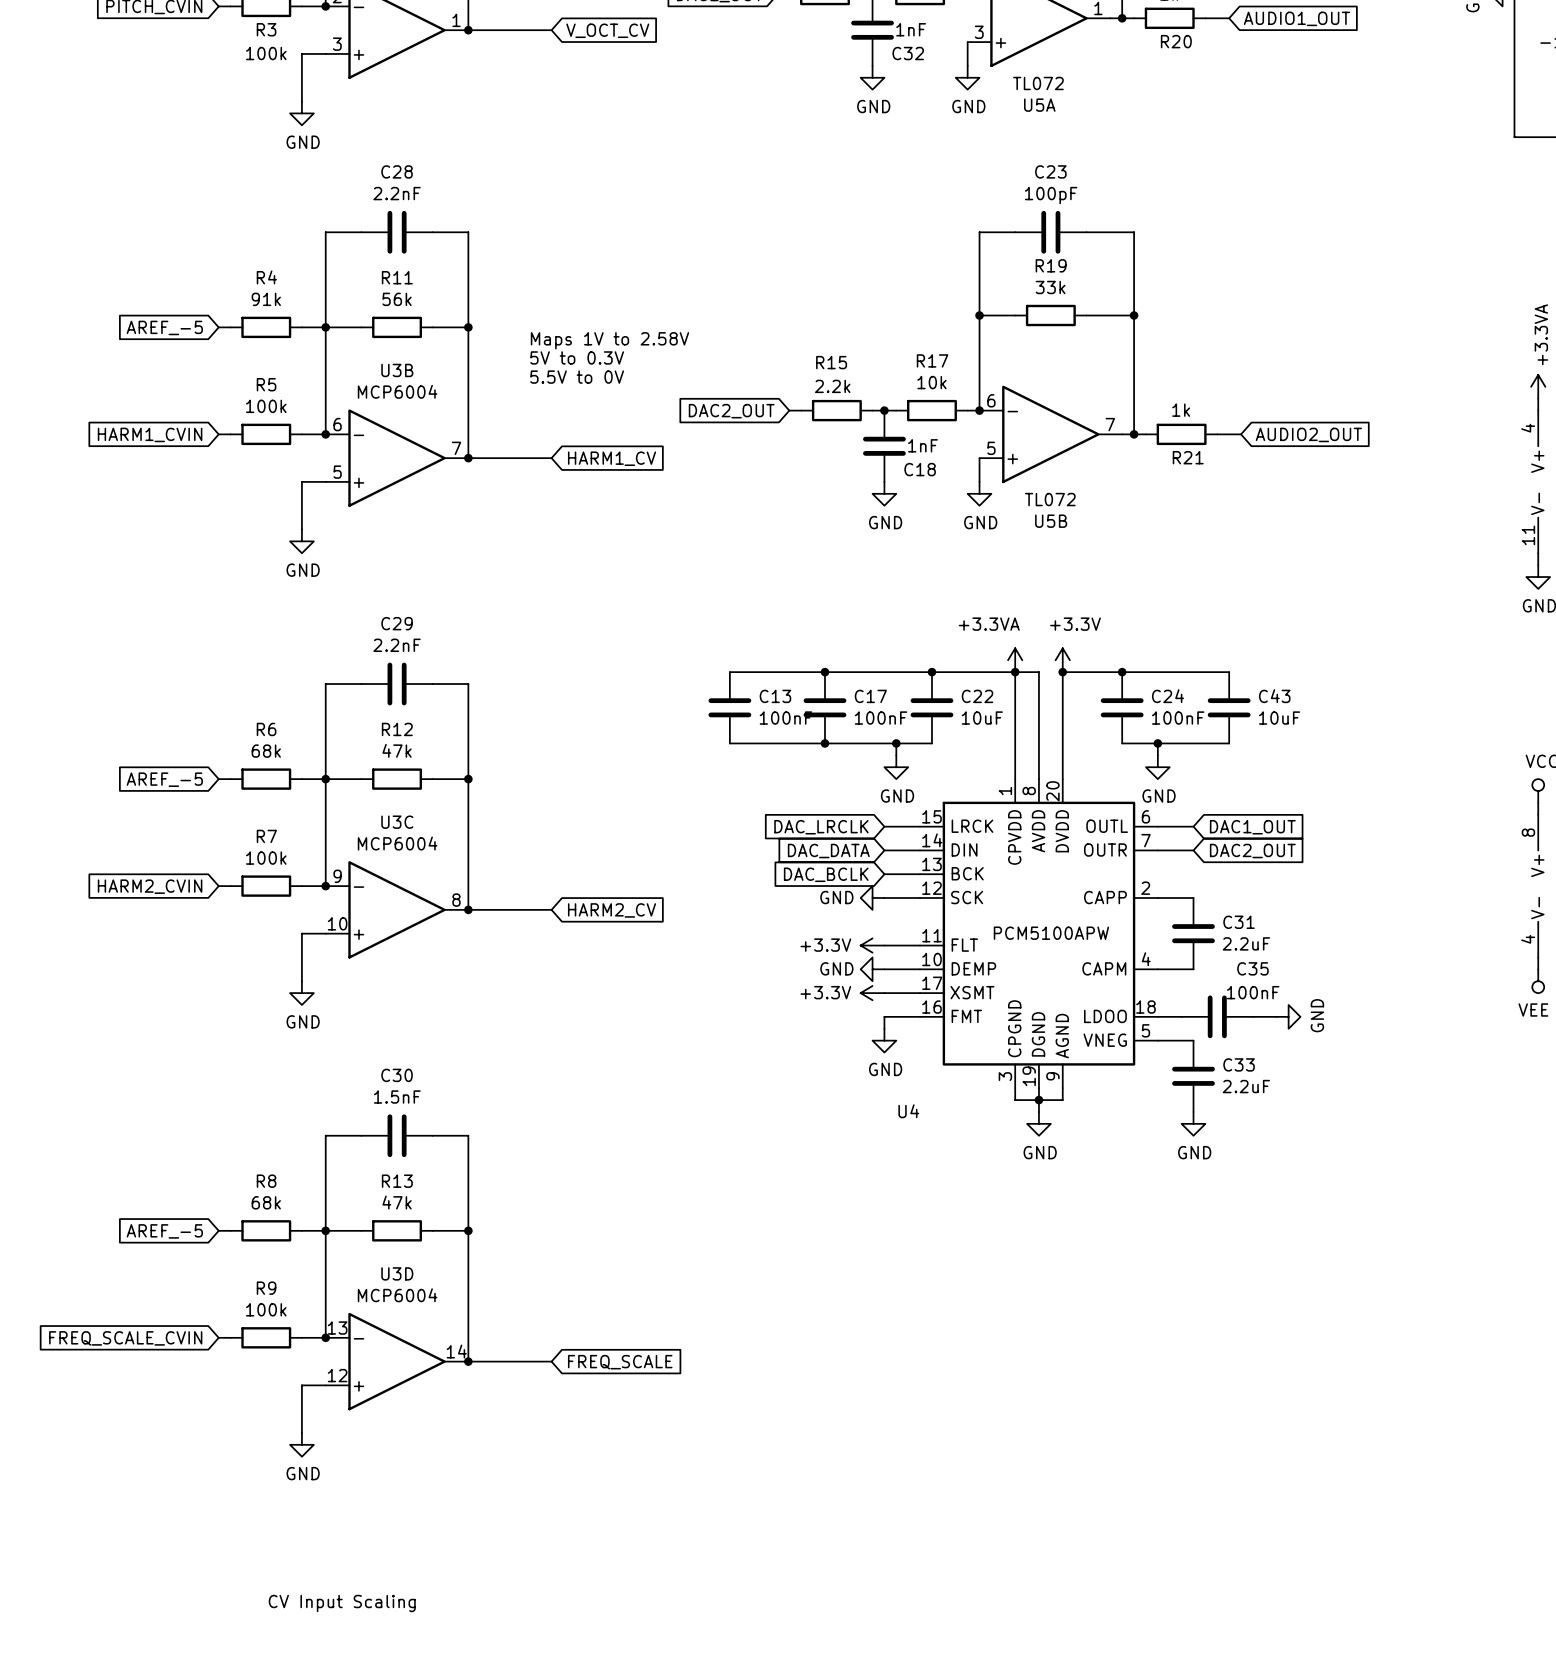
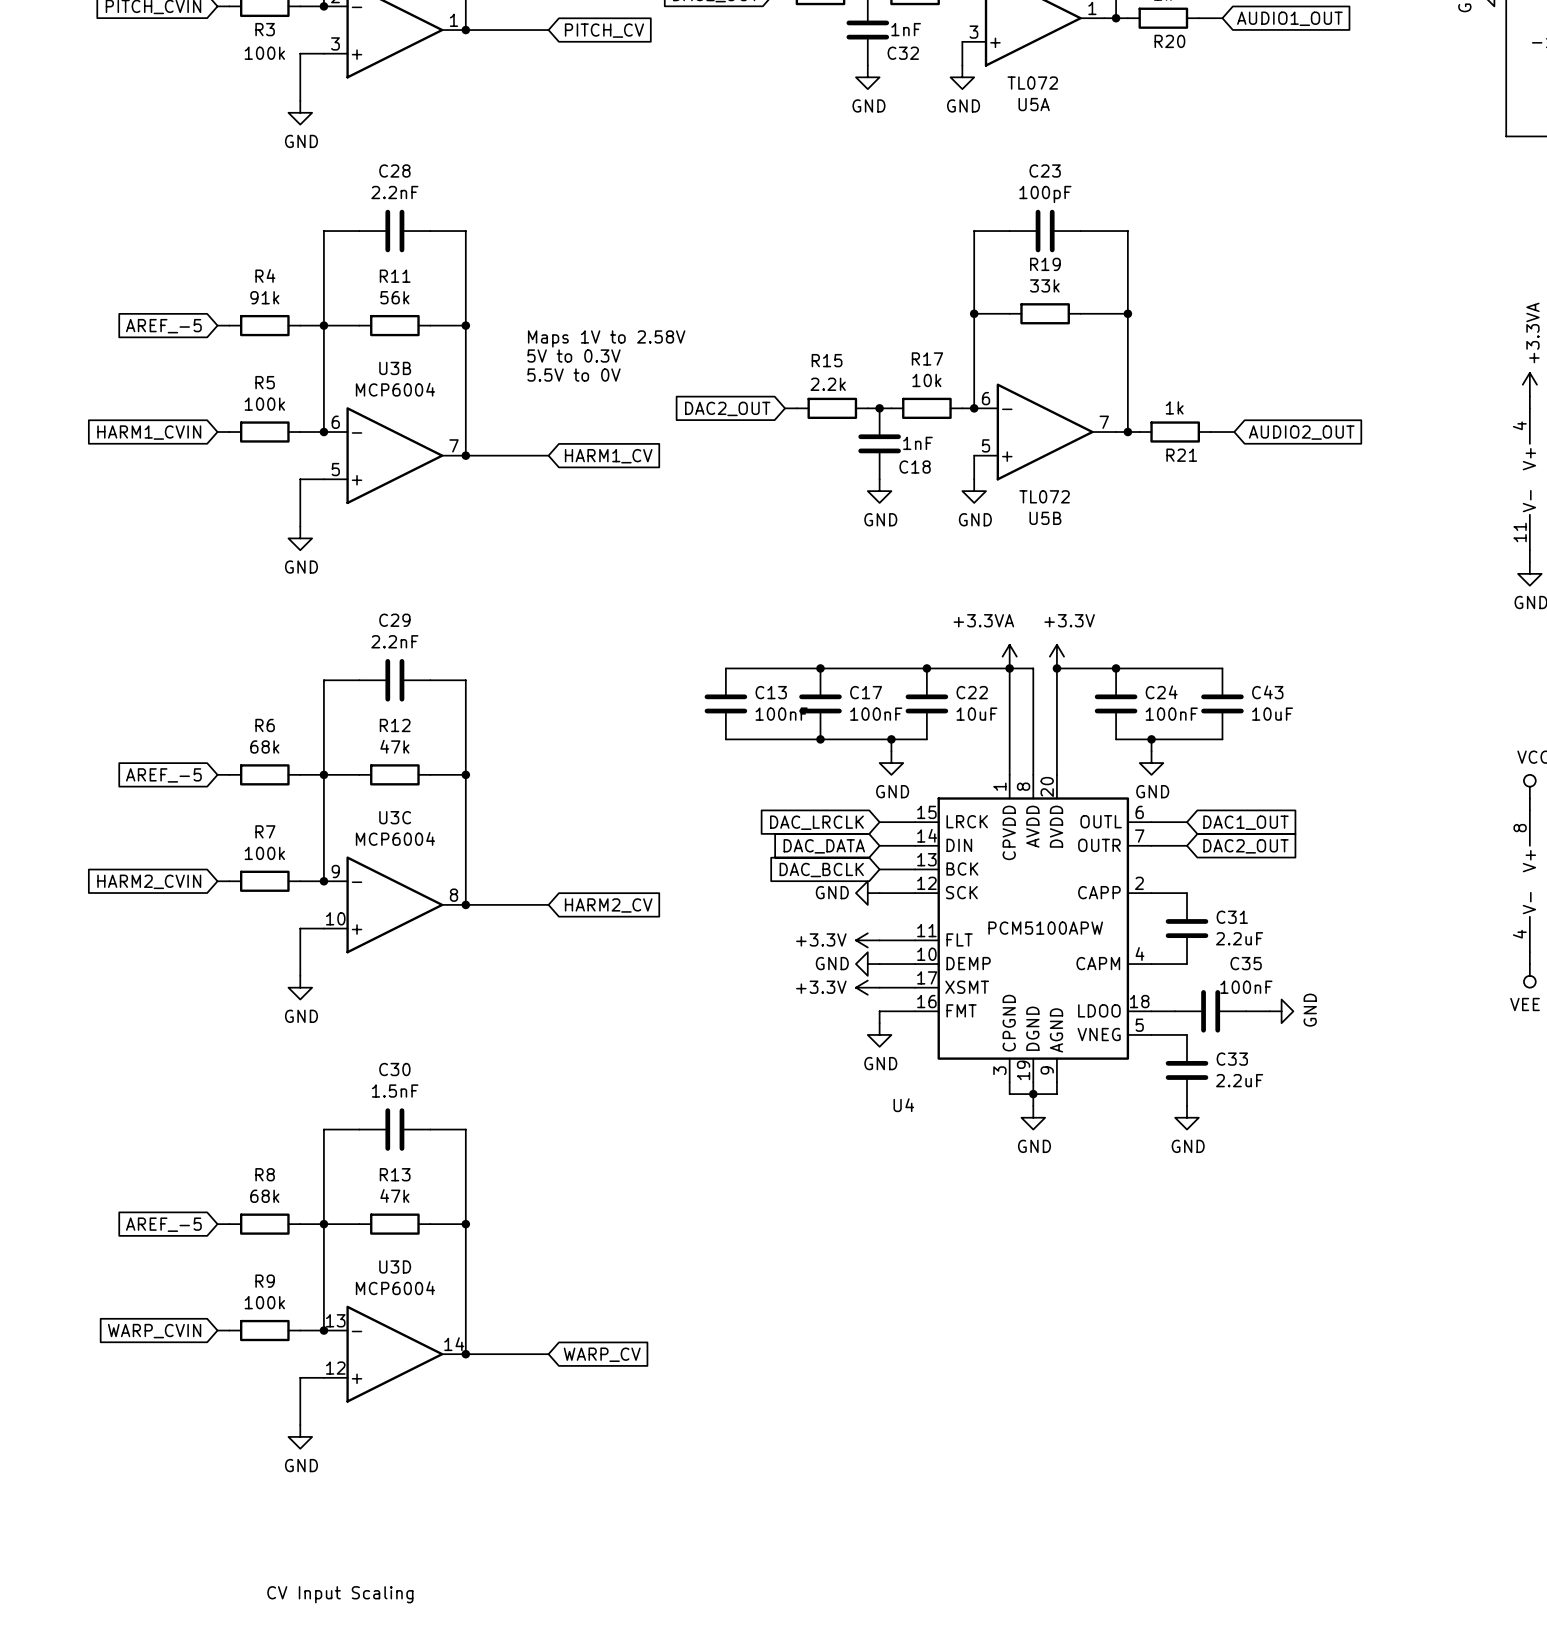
global label: V_OCT_CV (607, 30) -> PITCH_CV (604, 30)
global label: FREQ_SCALE_CVIN (125, 1338) -> WARP_CVIN (154, 1331)
global label: FREQ_SCALE (620, 1362) -> WARP_CV (602, 1354)

